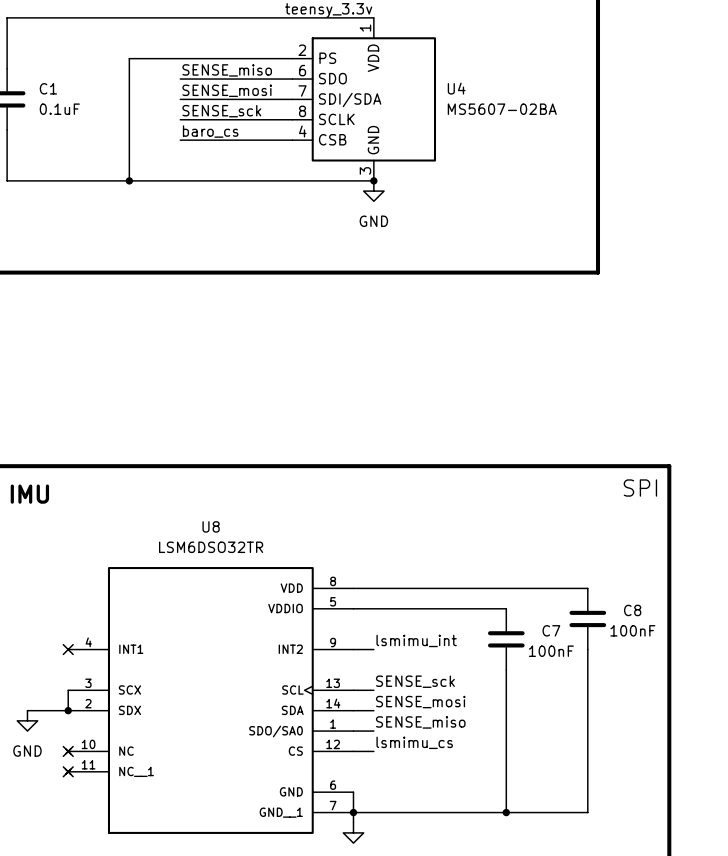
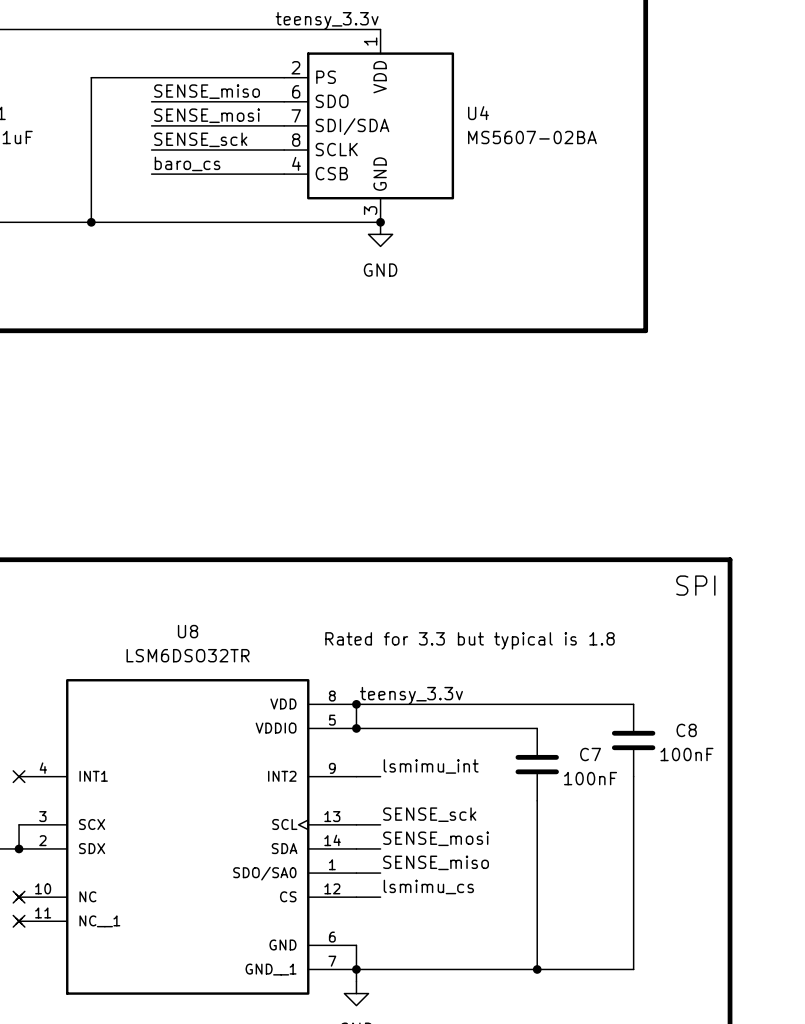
text: none -> Rated for 3.3 but typical is 1.8 (470, 640)
label: none -> teensy_3.3v (411, 695)
wire: none -> (356, 704) (356, 728)
junction: none -> (356, 704)
junction: none -> (356, 728)

